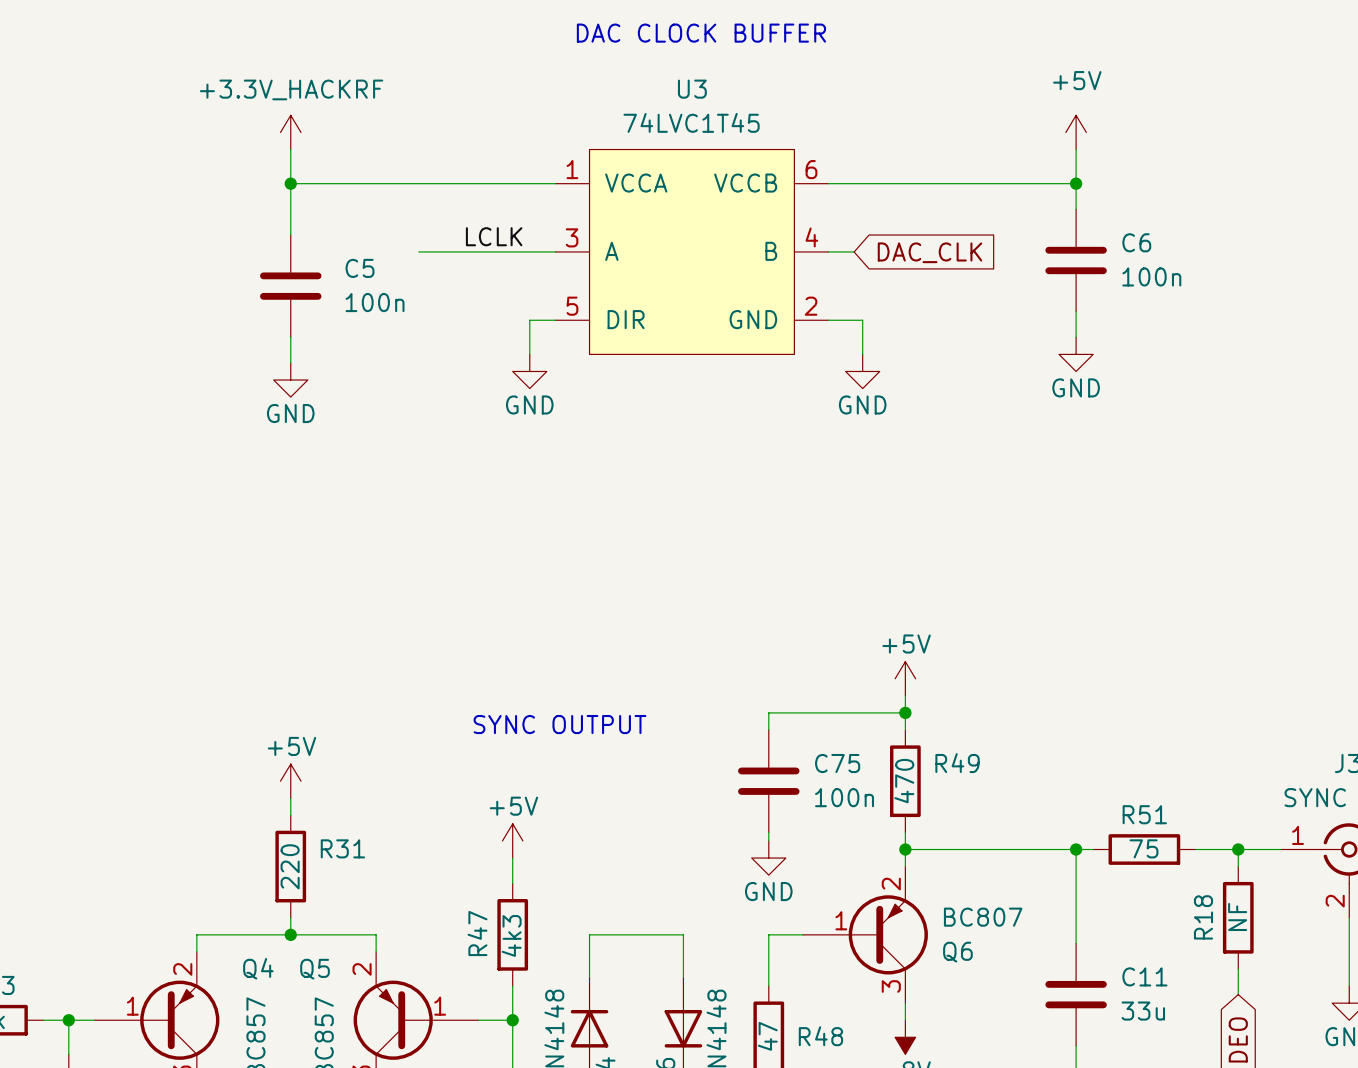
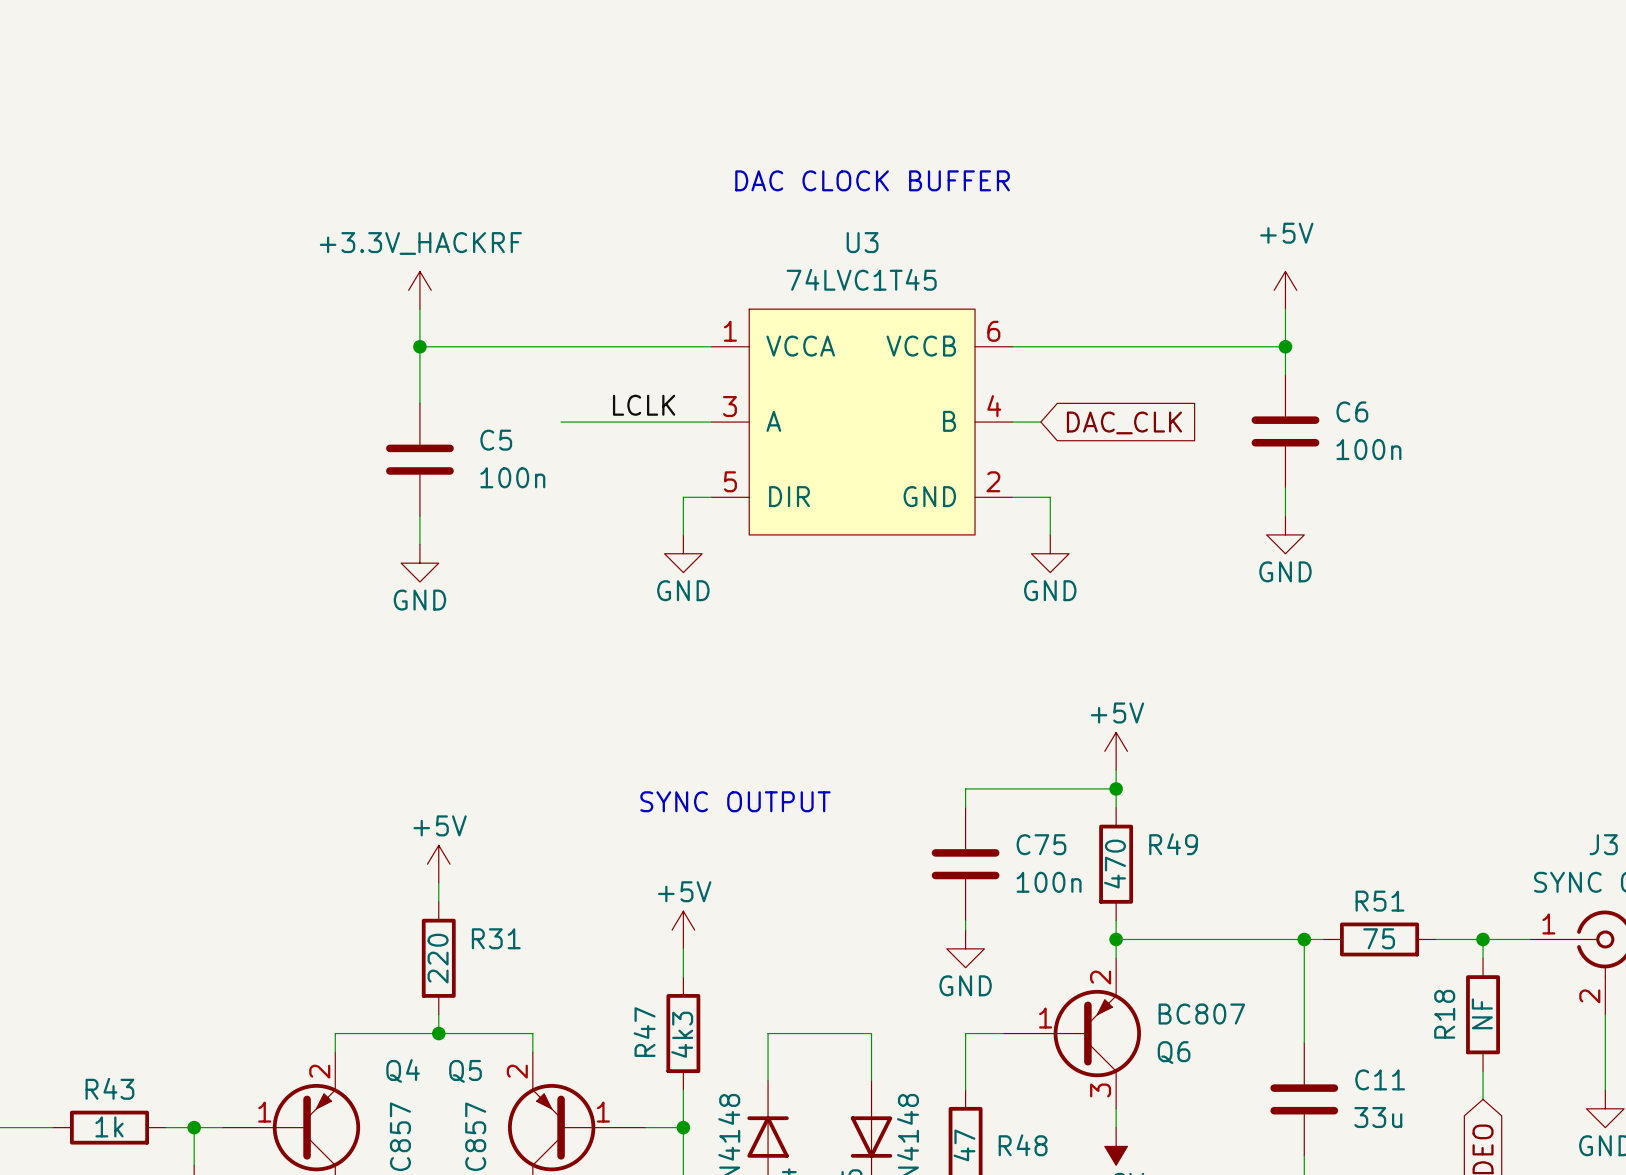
text position: DAC CLOCK BUFFER (701, 33) -> DAC CLOCK BUFFER (872, 180)
power symbol position: +3.3V_HACKRF (290, 132) -> +3.3V_HACKRF (419, 290)
power symbol position: +5V (1076, 132) -> +5V (1285, 290)
wire: (290, 149) (290, 234) -> (419, 309) (419, 403)
wire: (1076, 149) (1076, 209) -> (1285, 309) (1285, 375)
wire: (290, 183) (555, 183) -> (419, 346) (711, 346)
junction: (290, 183) -> none
wire: (828, 183) (1076, 183) -> (1012, 346) (1285, 346)
junction: (1076, 183) -> none
label position: LCLK (494, 236) -> LCLK (644, 405)
wire: (418, 251) (555, 251) -> (561, 422) (711, 422)
U3 position: (691, 251) -> (862, 422)
wire: (828, 251) (854, 251) -> (1012, 422) (1040, 422)
global label position: DAC_CLK (929, 252) -> DAC_CLK (1124, 422)
C6 position: (1076, 260) -> (1285, 431)
C5 position: (290, 286) -> (419, 459)
junction: none -> (419, 346)
junction: none -> (1285, 346)
wire: (1076, 311) (1076, 337) -> (1285, 487) (1285, 516)
wire: (555, 320) (529, 320) (529, 354) -> (711, 497) (683, 497) (683, 534)
wire: (828, 320) (862, 320) (862, 354) -> (1012, 497) (1050, 497) (1050, 534)
wire: (290, 337) (290, 362) -> (419, 516) (419, 544)
power symbol: GND (1076, 354) -> none
power symbol: GND (529, 371) -> none
power symbol: GND (862, 371) -> none
power symbol: GND (290, 380) -> none
power symbol: none -> GND (1285, 534)
power symbol: none -> GND (683, 553)
power symbol: none -> GND (1050, 553)
power symbol: none -> GND (419, 563)

